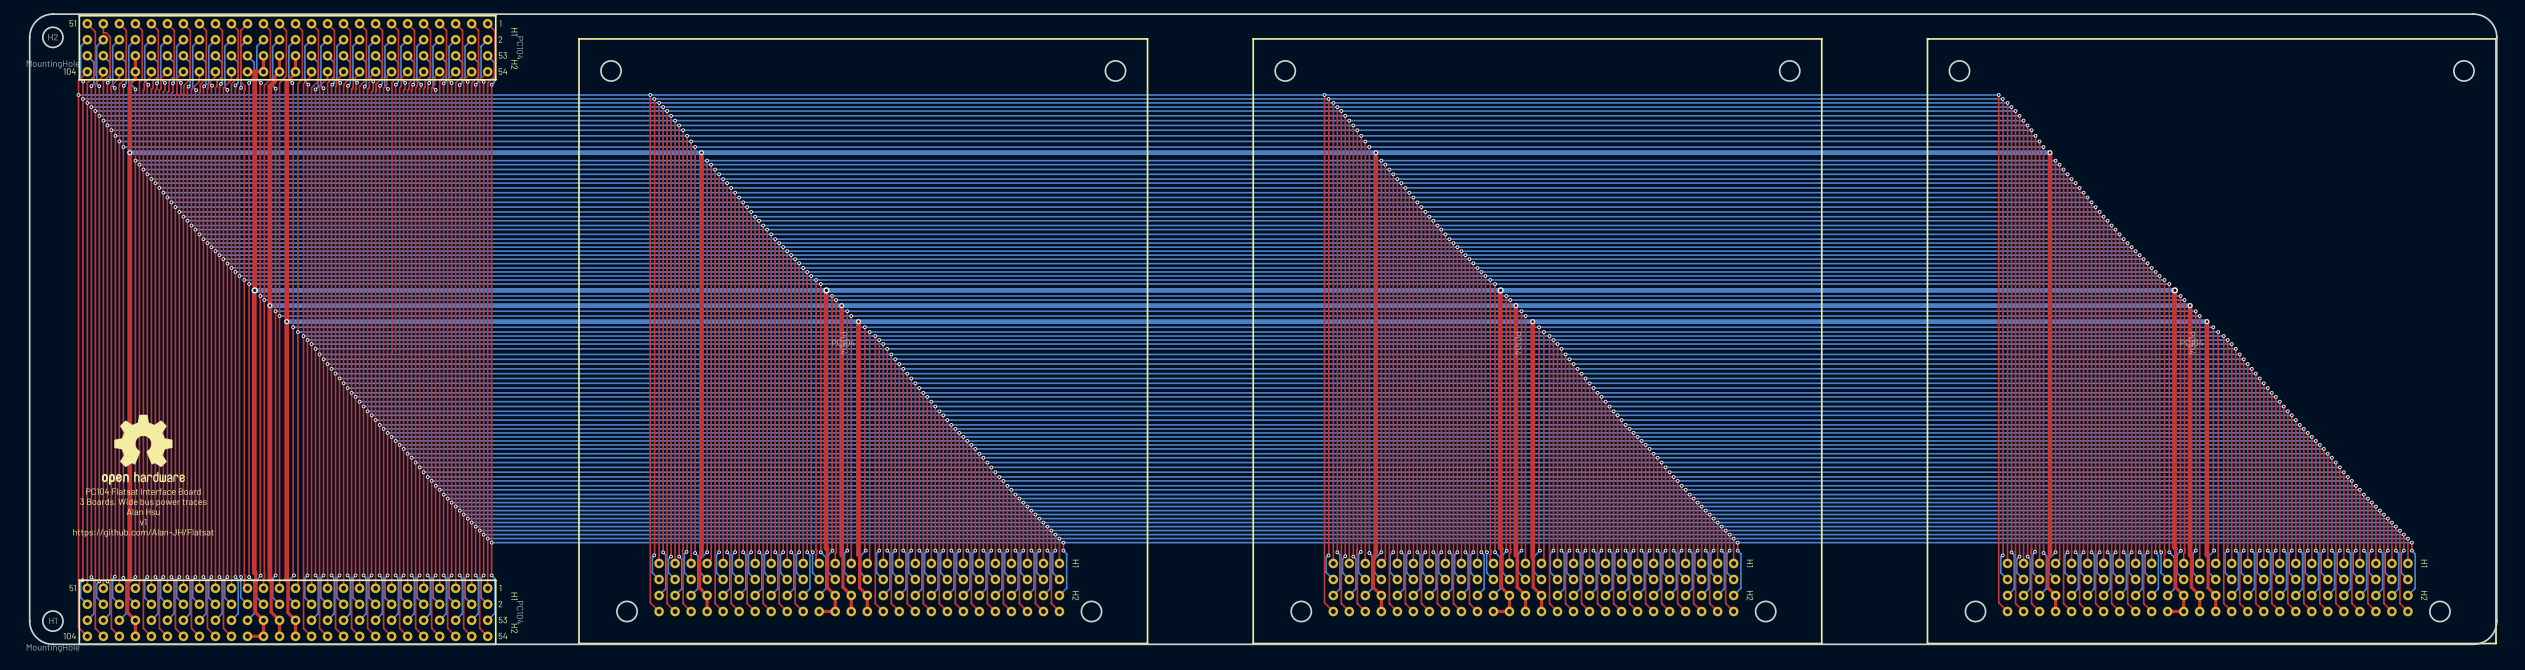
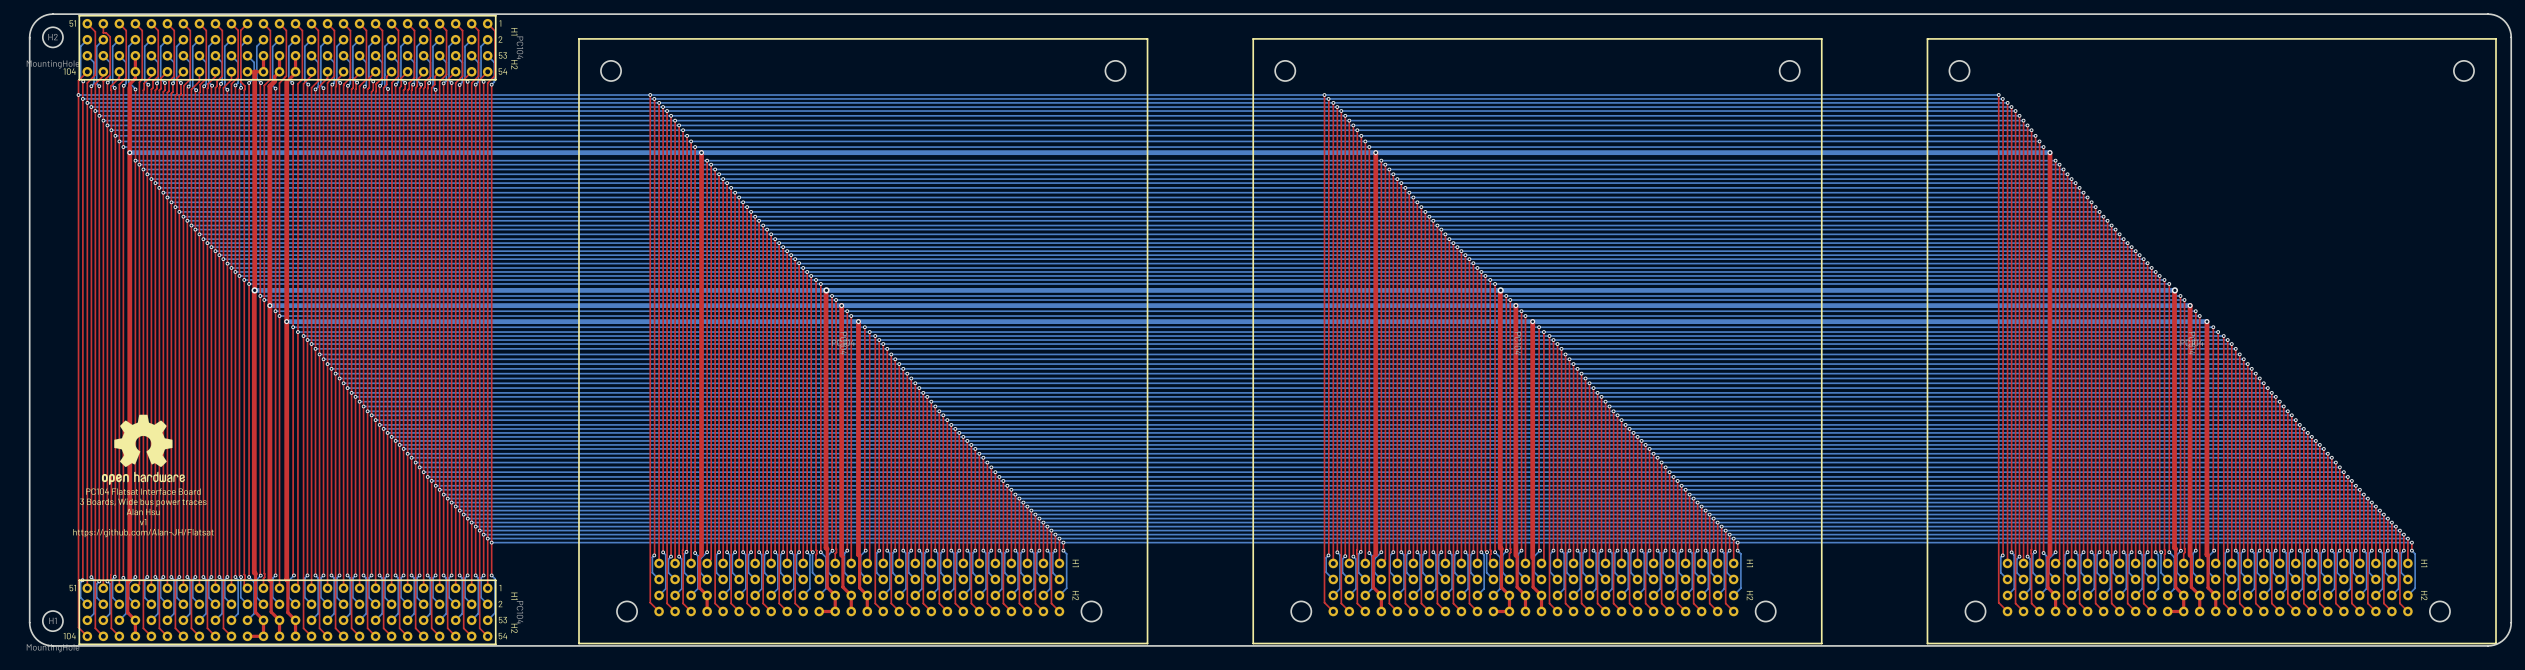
board edge: (2473, 14) (2482, 15) (2490, 20) (2495, 28) (2496, 37) (2496, 621) (2492, 635) (2479, 643) (52, 644) (44, 642) (36, 637) (31, 629) (29, 621) -> (2473, 14) (2491, 14) (2499, 17) (2508, 25) (2511, 37) (2511, 622) (2506, 636) (2494, 645) (52, 645) (44, 644) (36, 639) (31, 631) (29, 621)

